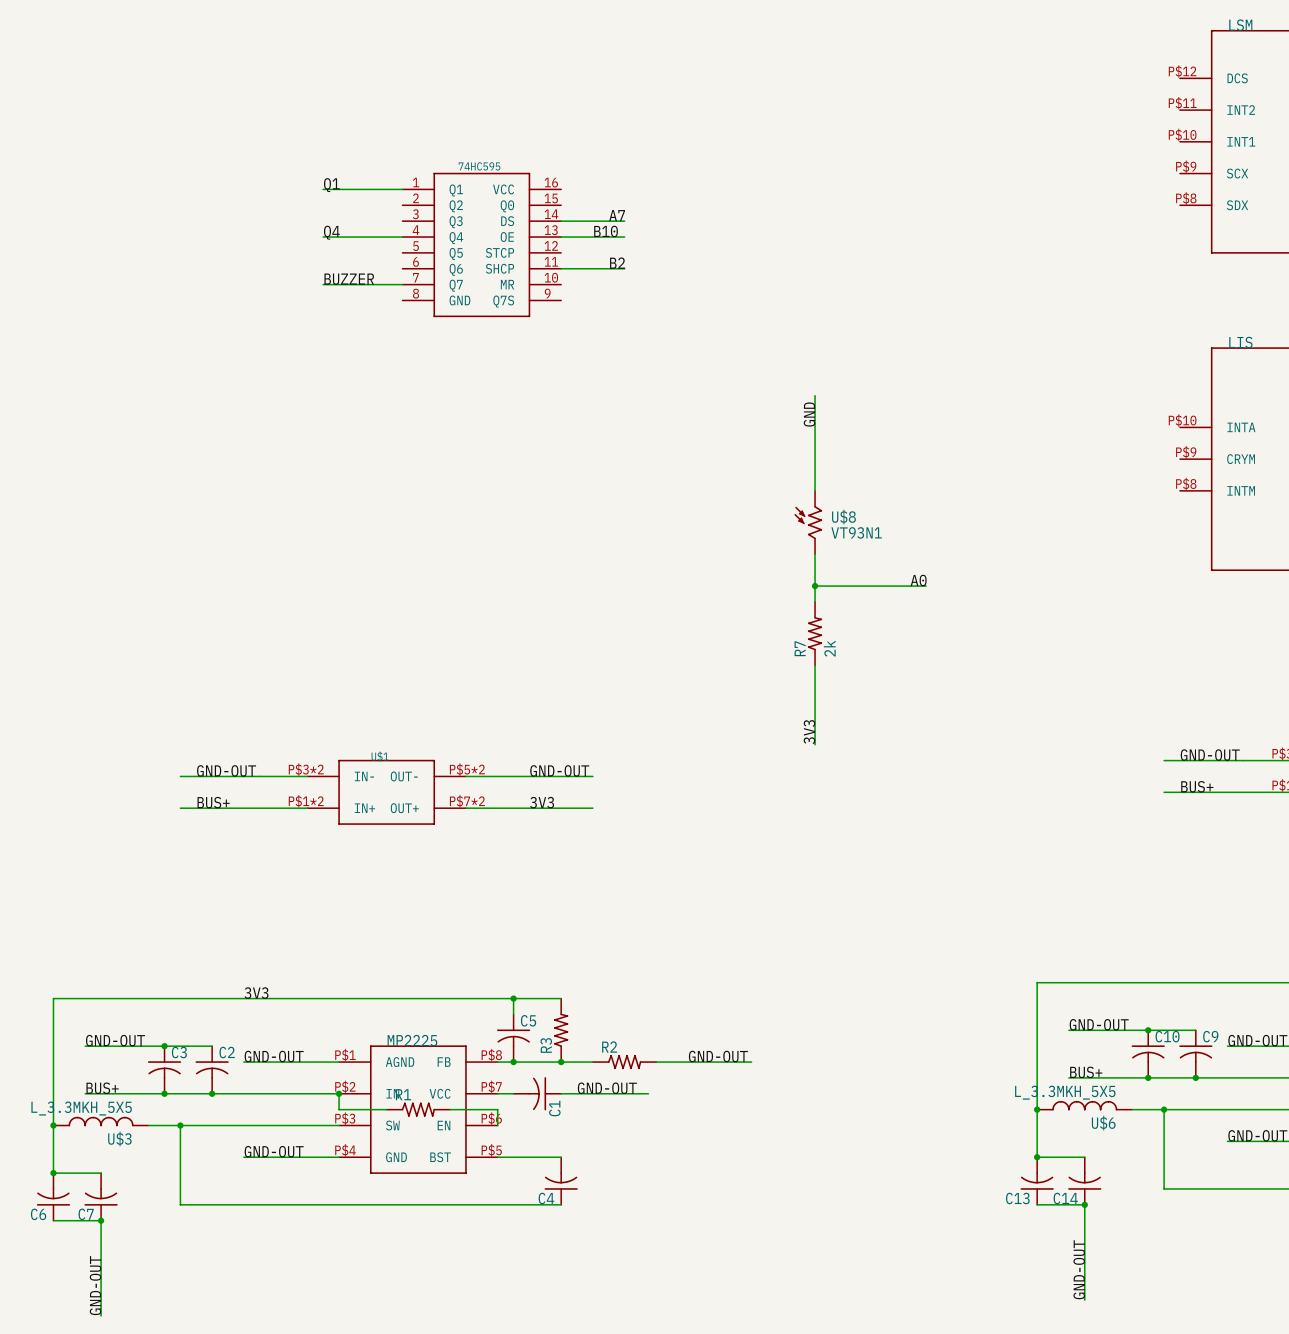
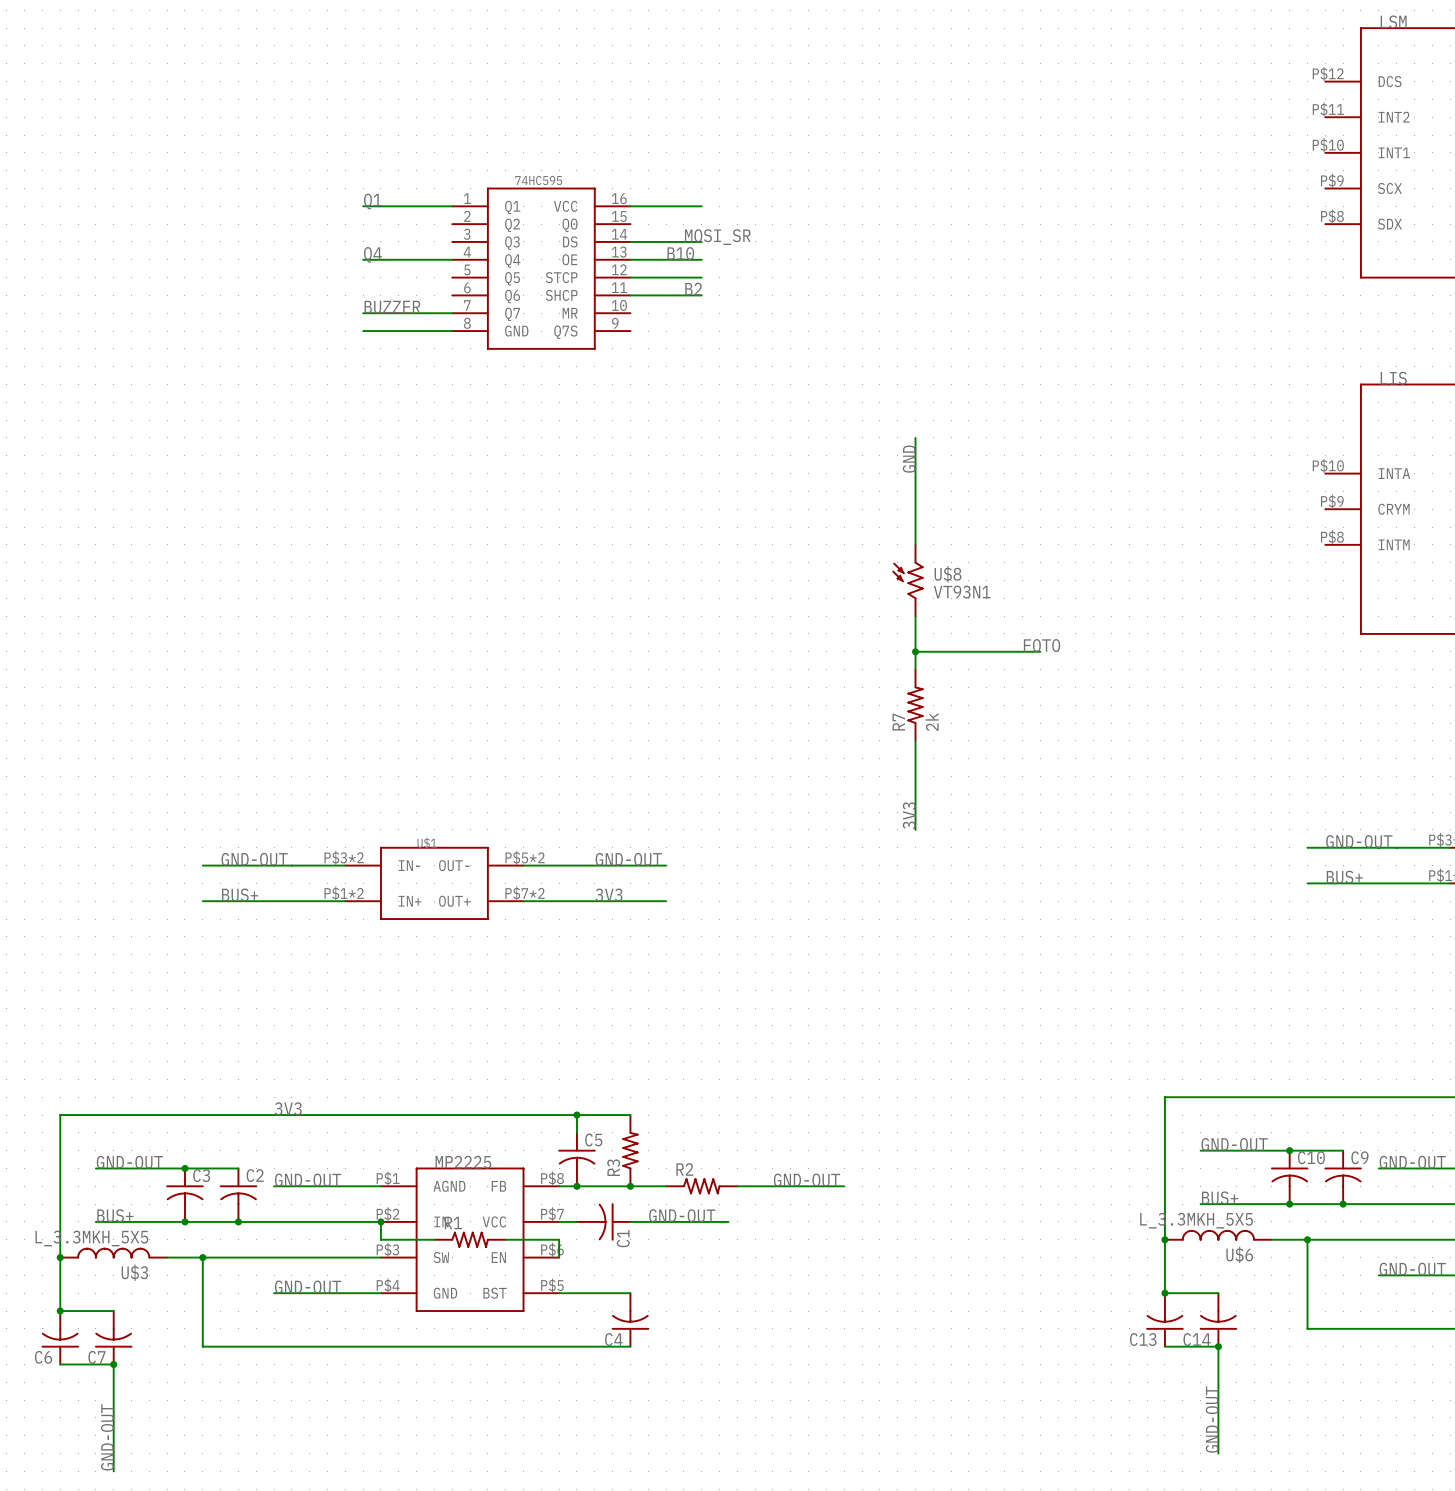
wire: none -> (630, 206) (701, 206)
label: A7 (617, 215) -> MOSI_SR (717, 237)
wire: none -> (630, 277) (701, 277)
wire: none -> (363, 331) (452, 331)
label: A0 (918, 580) -> FOTO (1041, 645)

